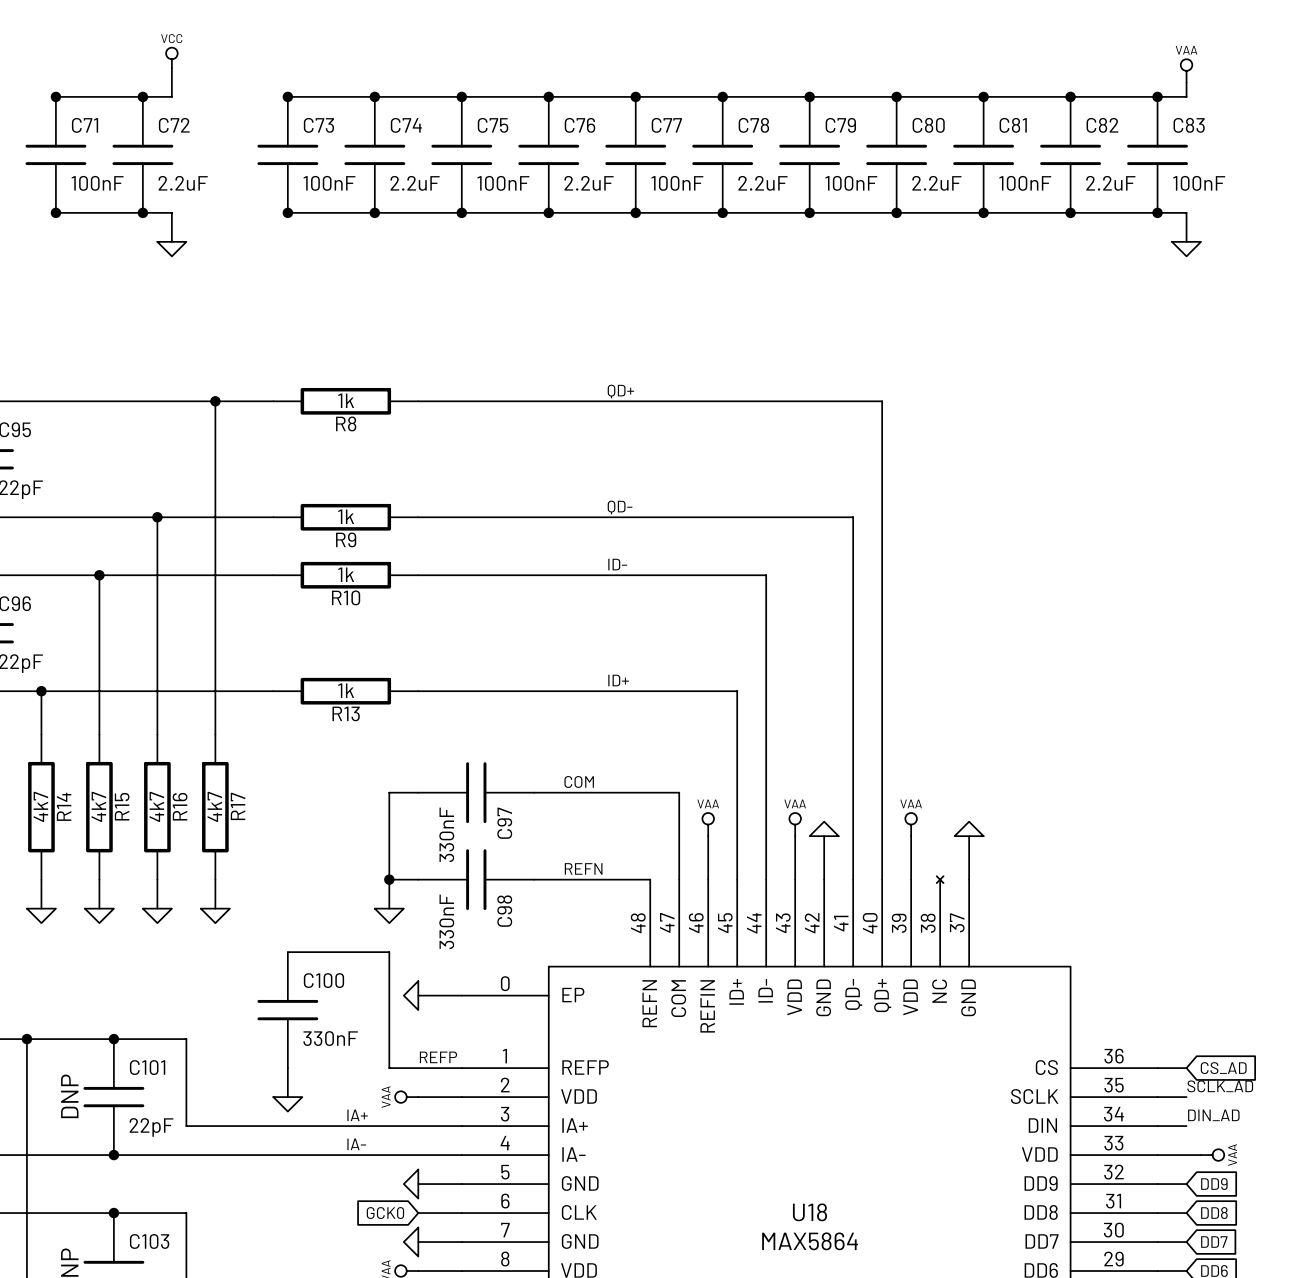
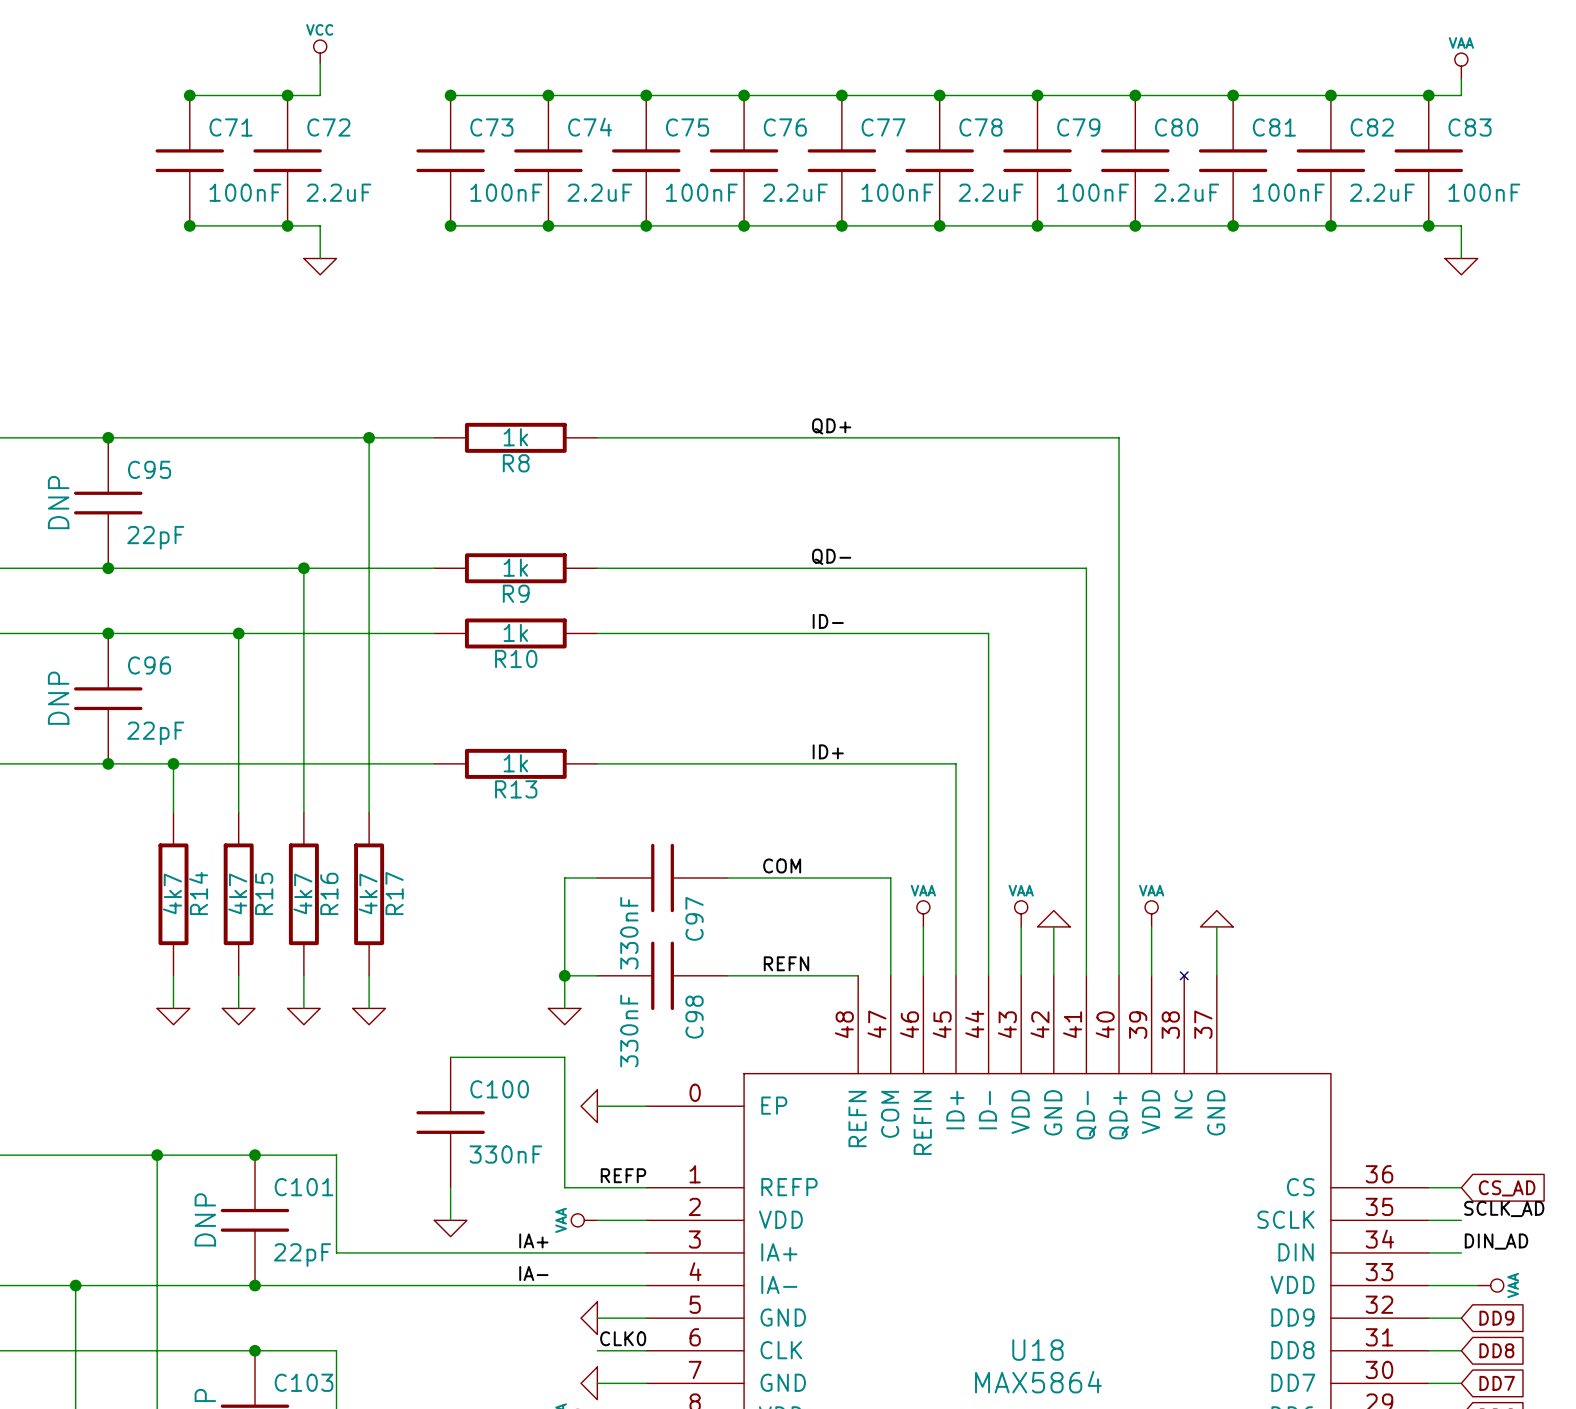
label: none -> CLK0 (623, 1338)
global label: GCK0 (385, 1213) -> none

